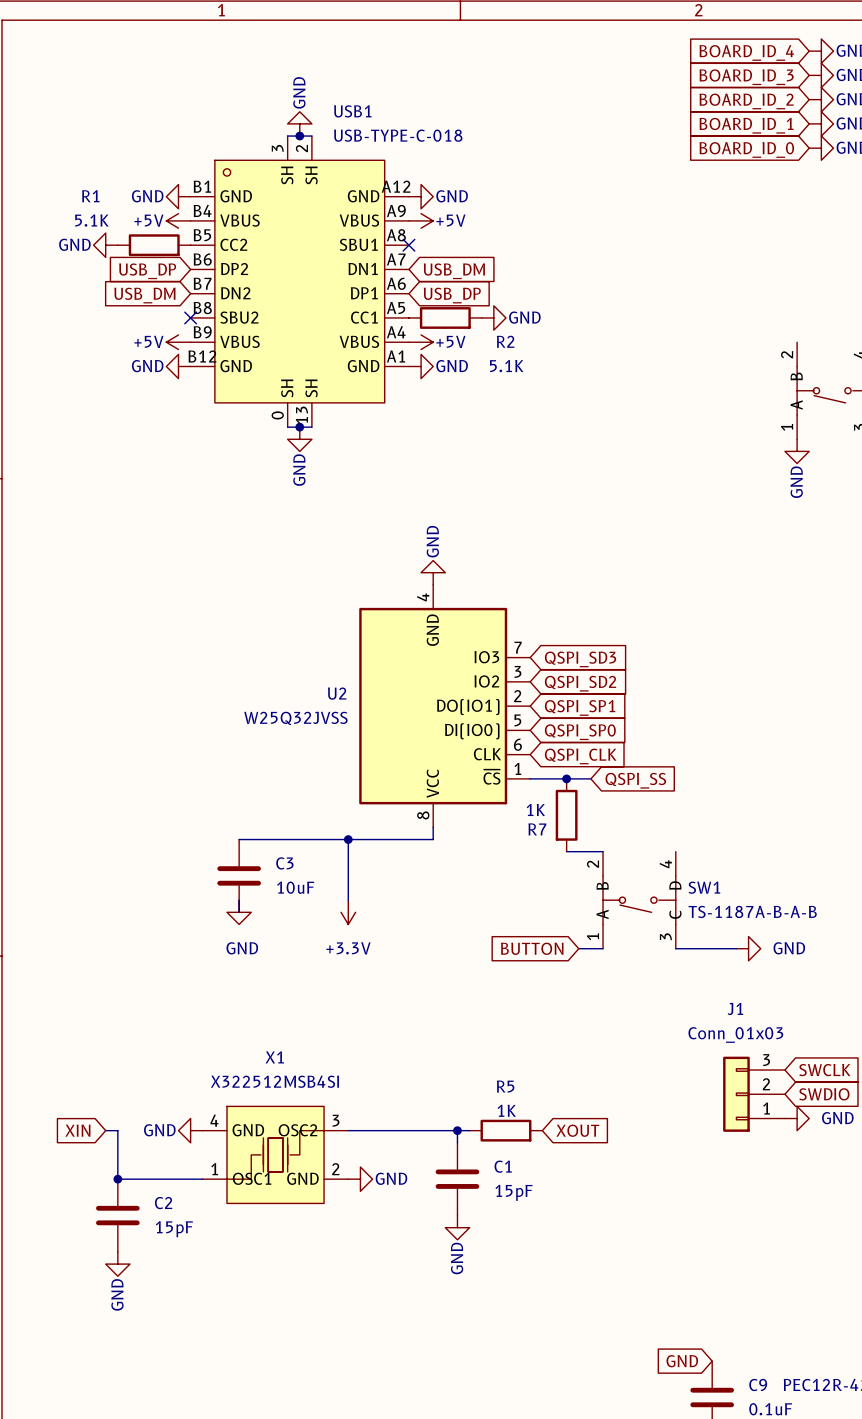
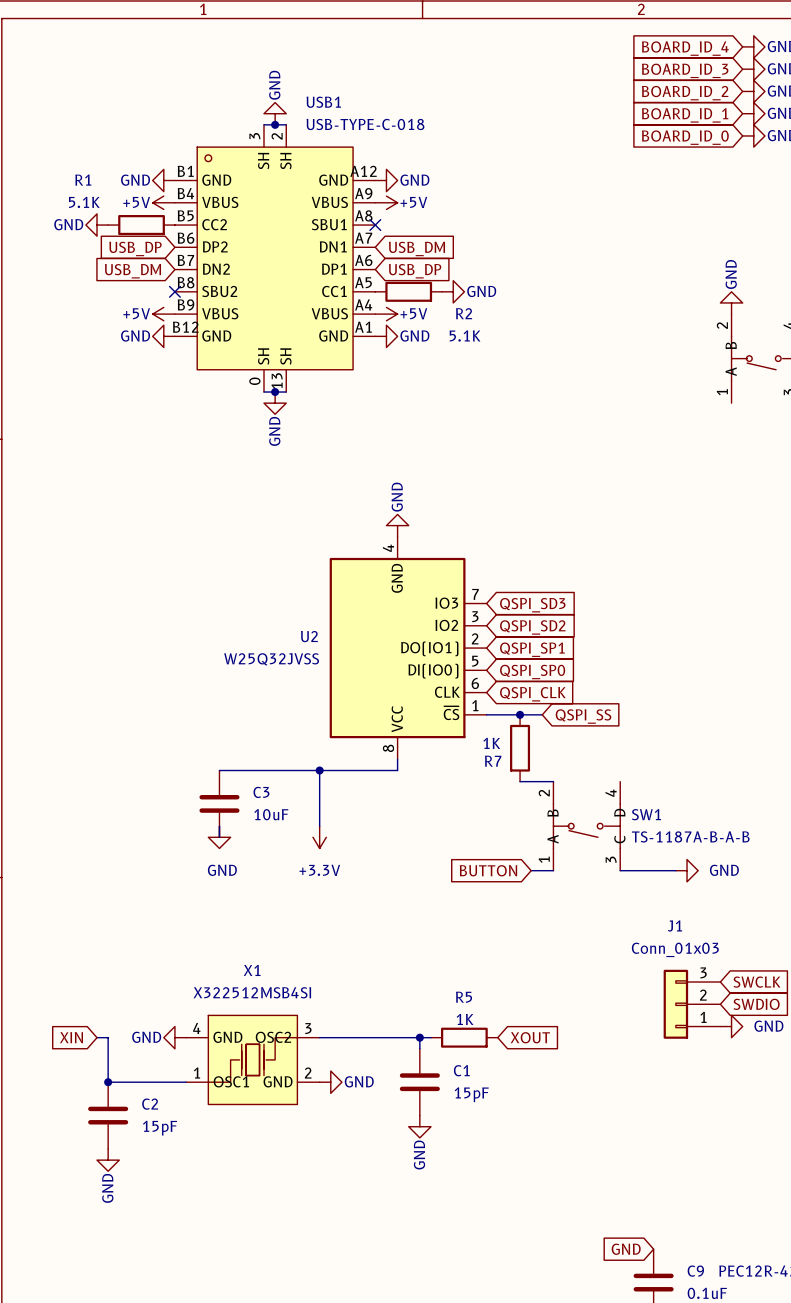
power symbol rotation: 0° (797, 451) -> 180° (731, 302)
power symbol position: GND (797, 451) -> GND (731, 302)

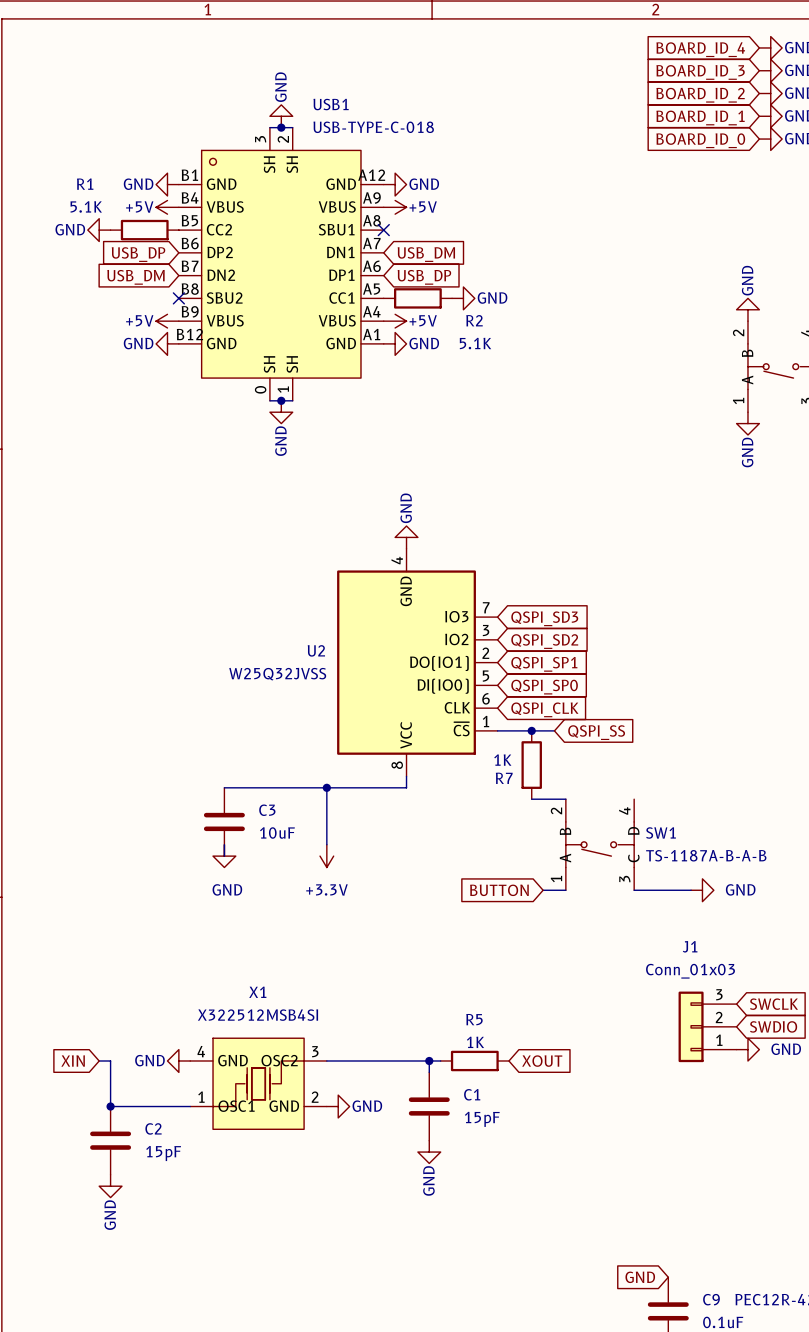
USB1 pin number: 13 (277, 381) -> 1 (283, 389)
power symbol: none -> GND (747, 423)

